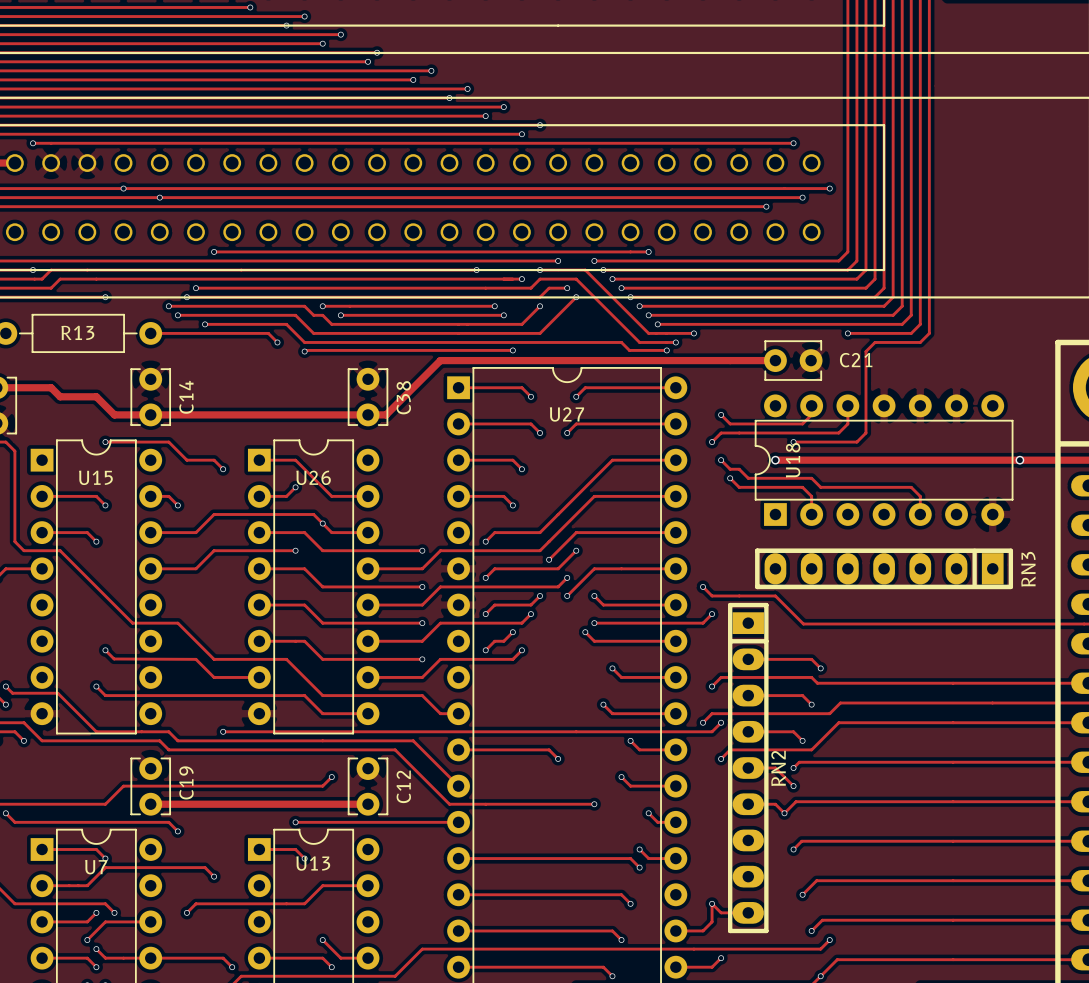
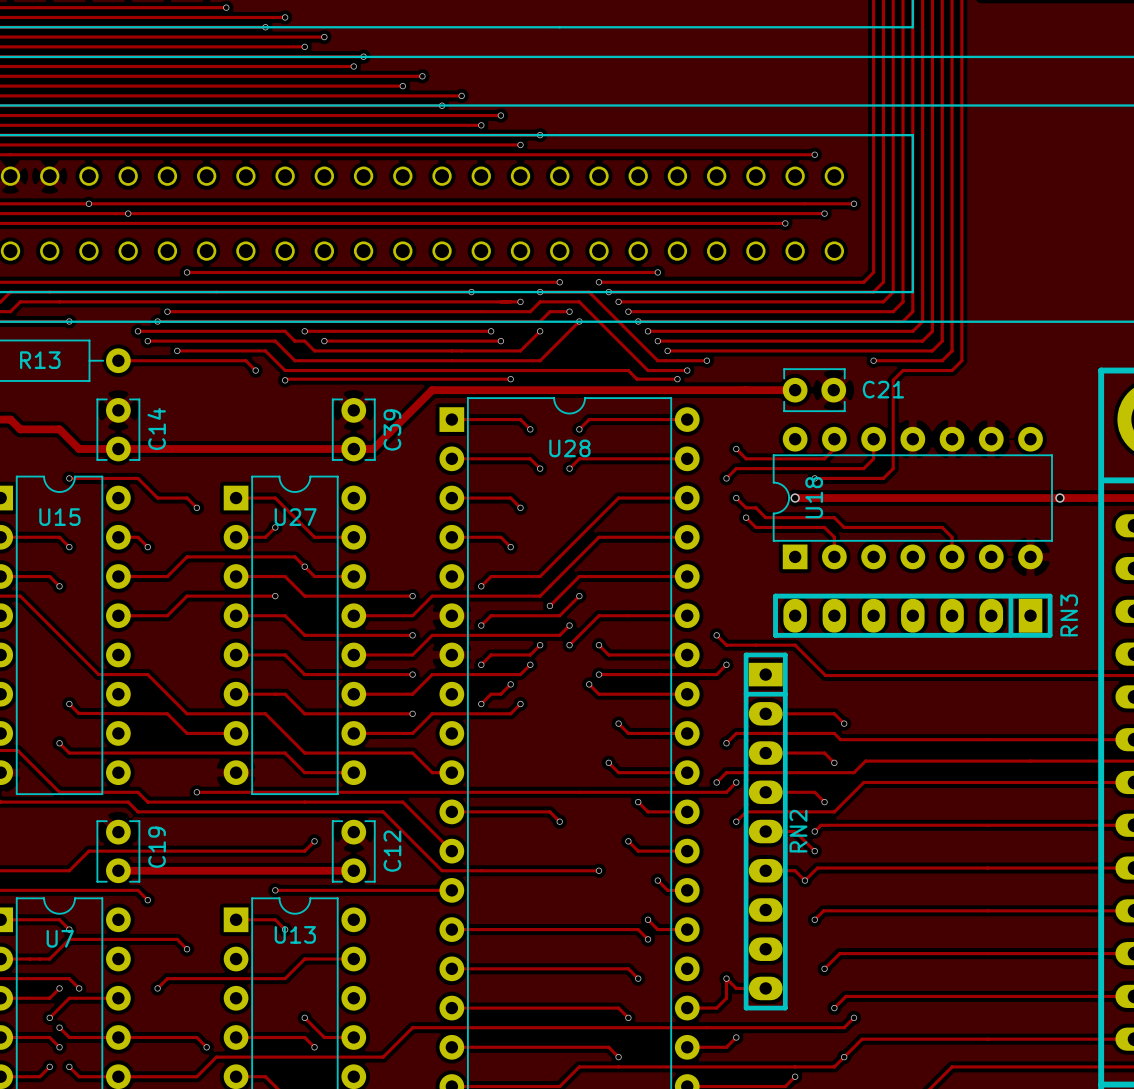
C38 name: C38 (403, 397) -> C39 (392, 430)
U27 name: U27 (566, 414) -> U28 (569, 448)
U26 name: U26 (313, 477) -> U27 (295, 517)

